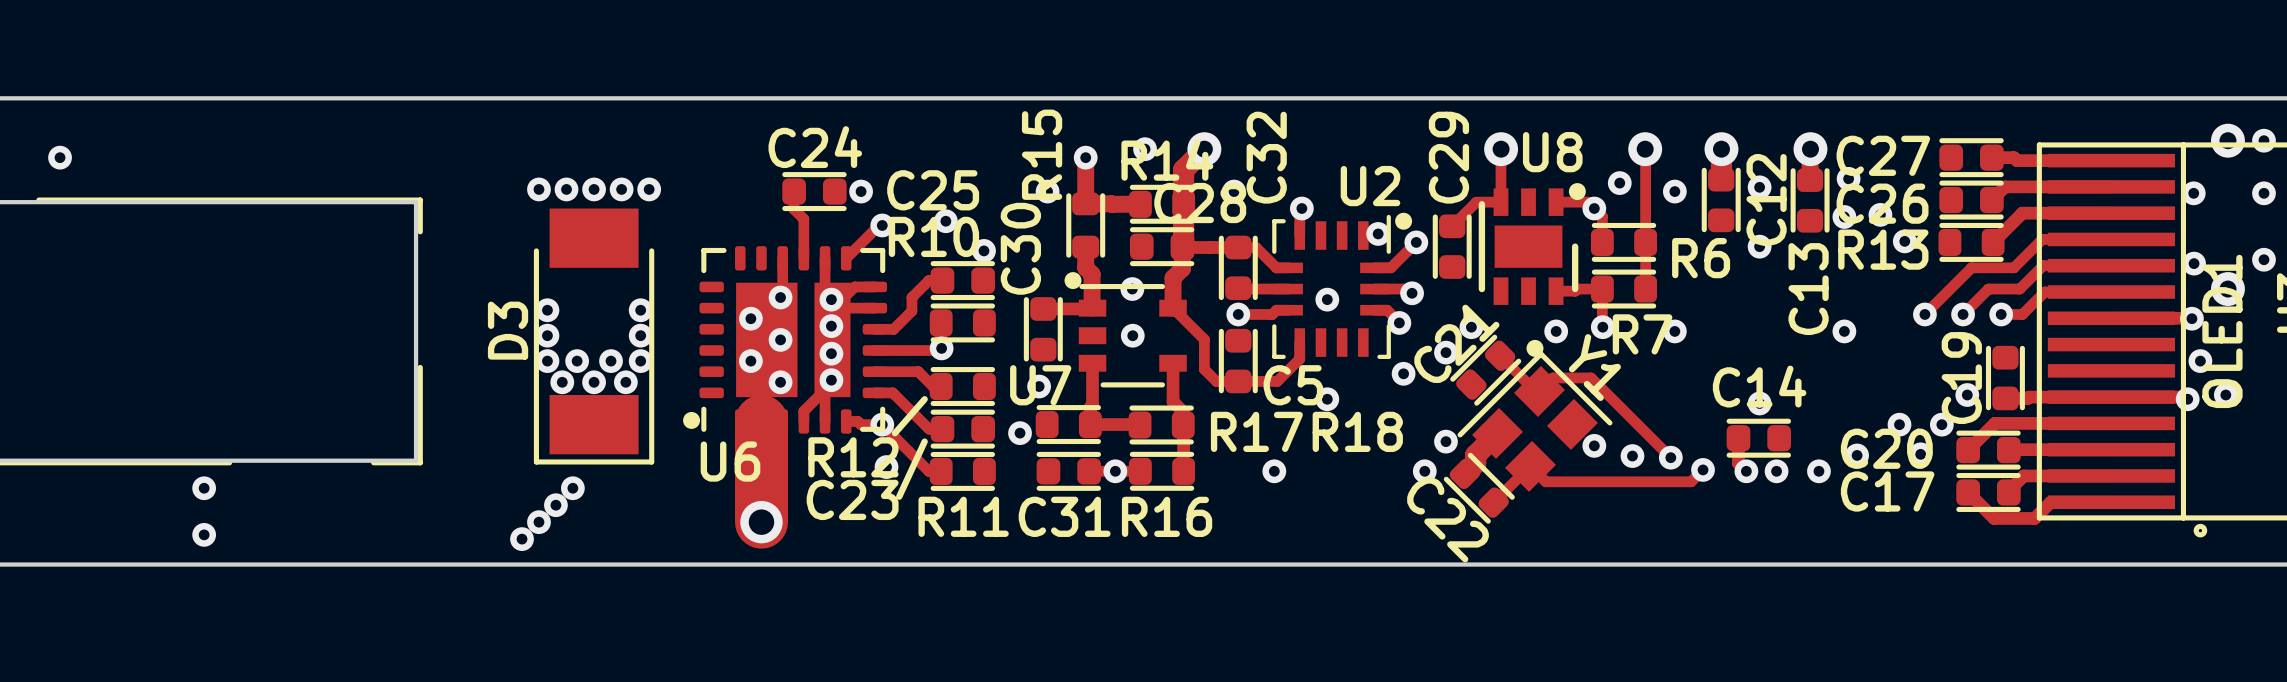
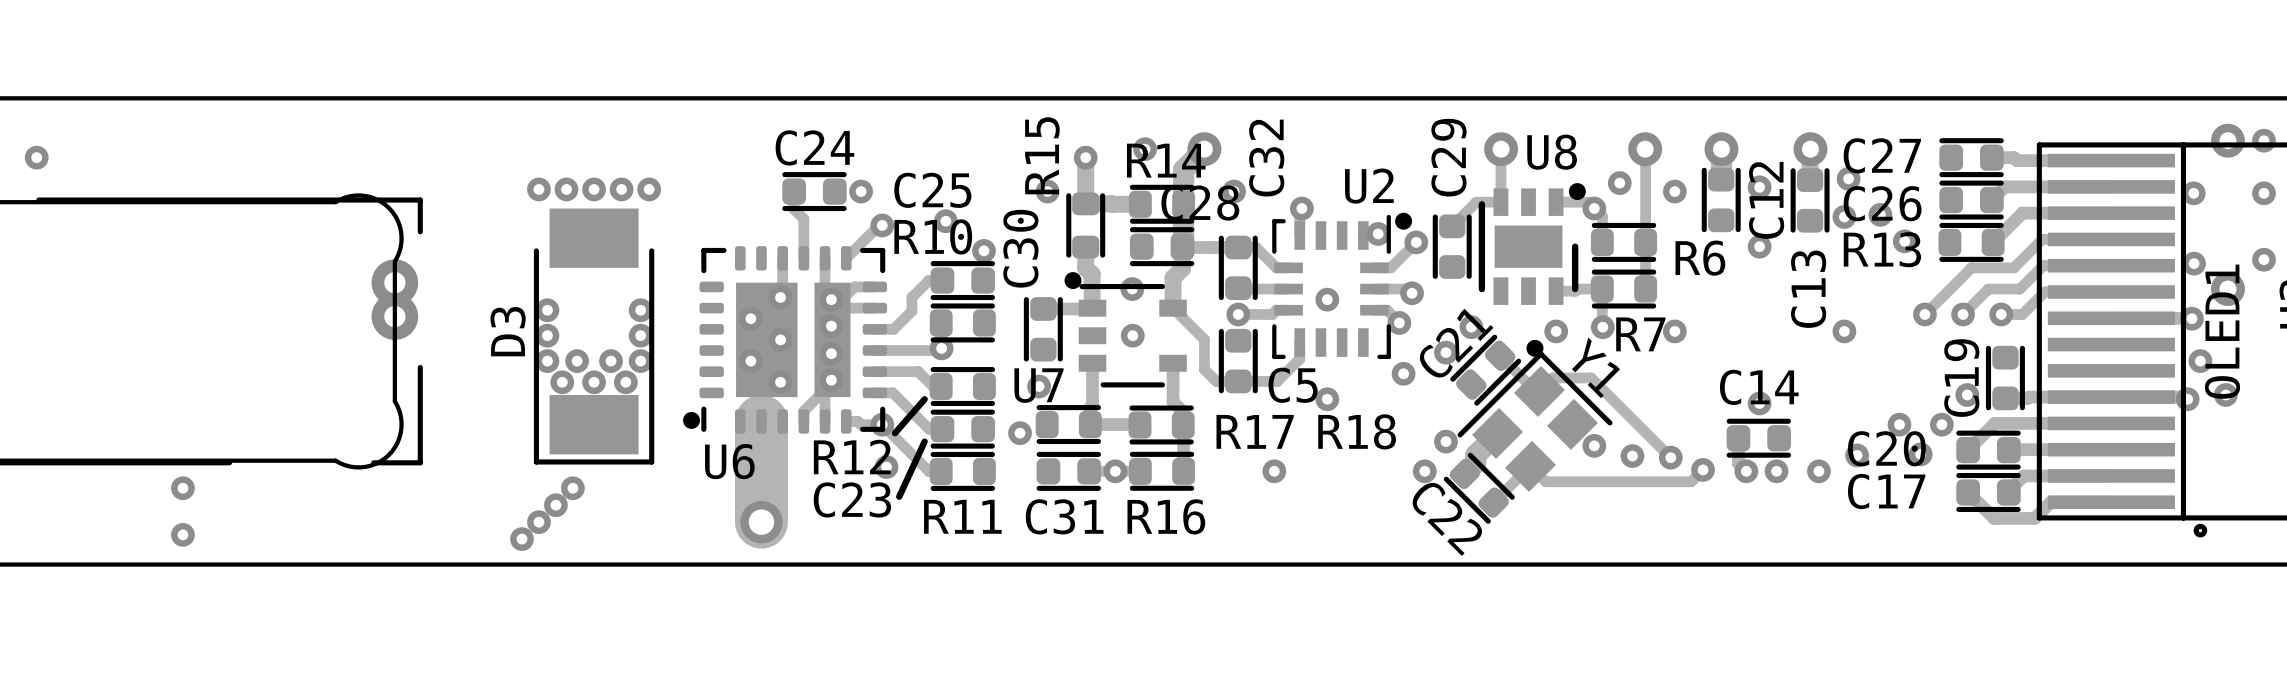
via position: (60, 157) -> (36, 157)
board edge: (335, 202) (416, 202) (416, 460) (335, 460) -> (335, 202) (350, 196) (371, 197) (389, 208) (399, 225) (401, 241) (394, 261) (394, 401) (399, 410) (401, 426) (395, 446) (380, 461) (371, 465) (355, 467) (335, 460)
via: none -> (394, 282)
via: none -> (394, 316)
via position: (204, 488) -> (182, 488)
via position: (204, 534) -> (182, 534)

